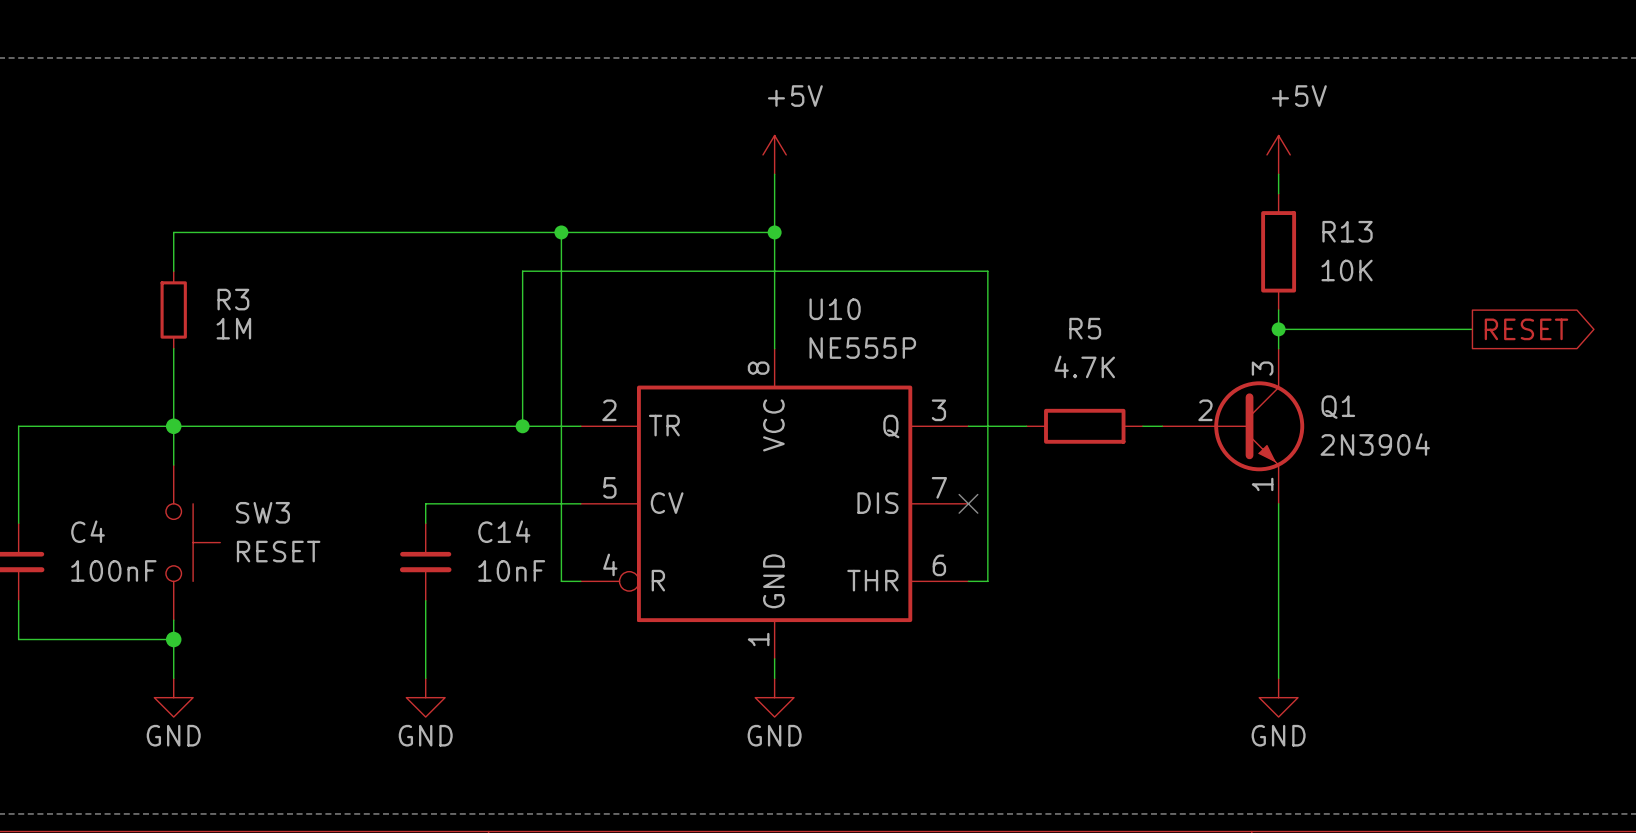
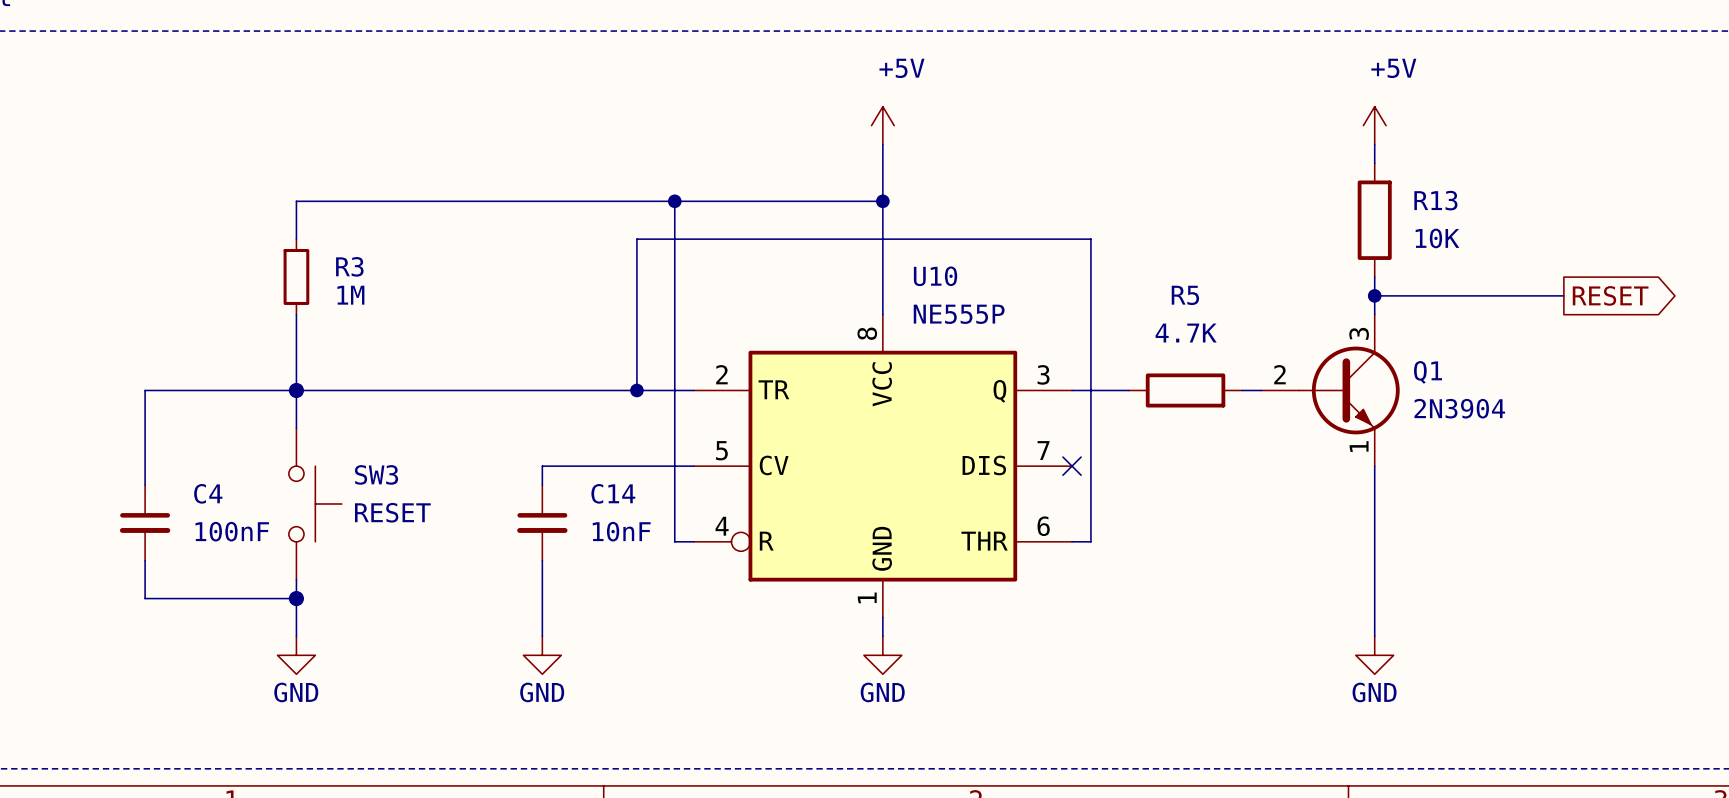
Q1 symbol: [1162, 348, 1305, 504] -> [1261, 314, 1400, 467]

